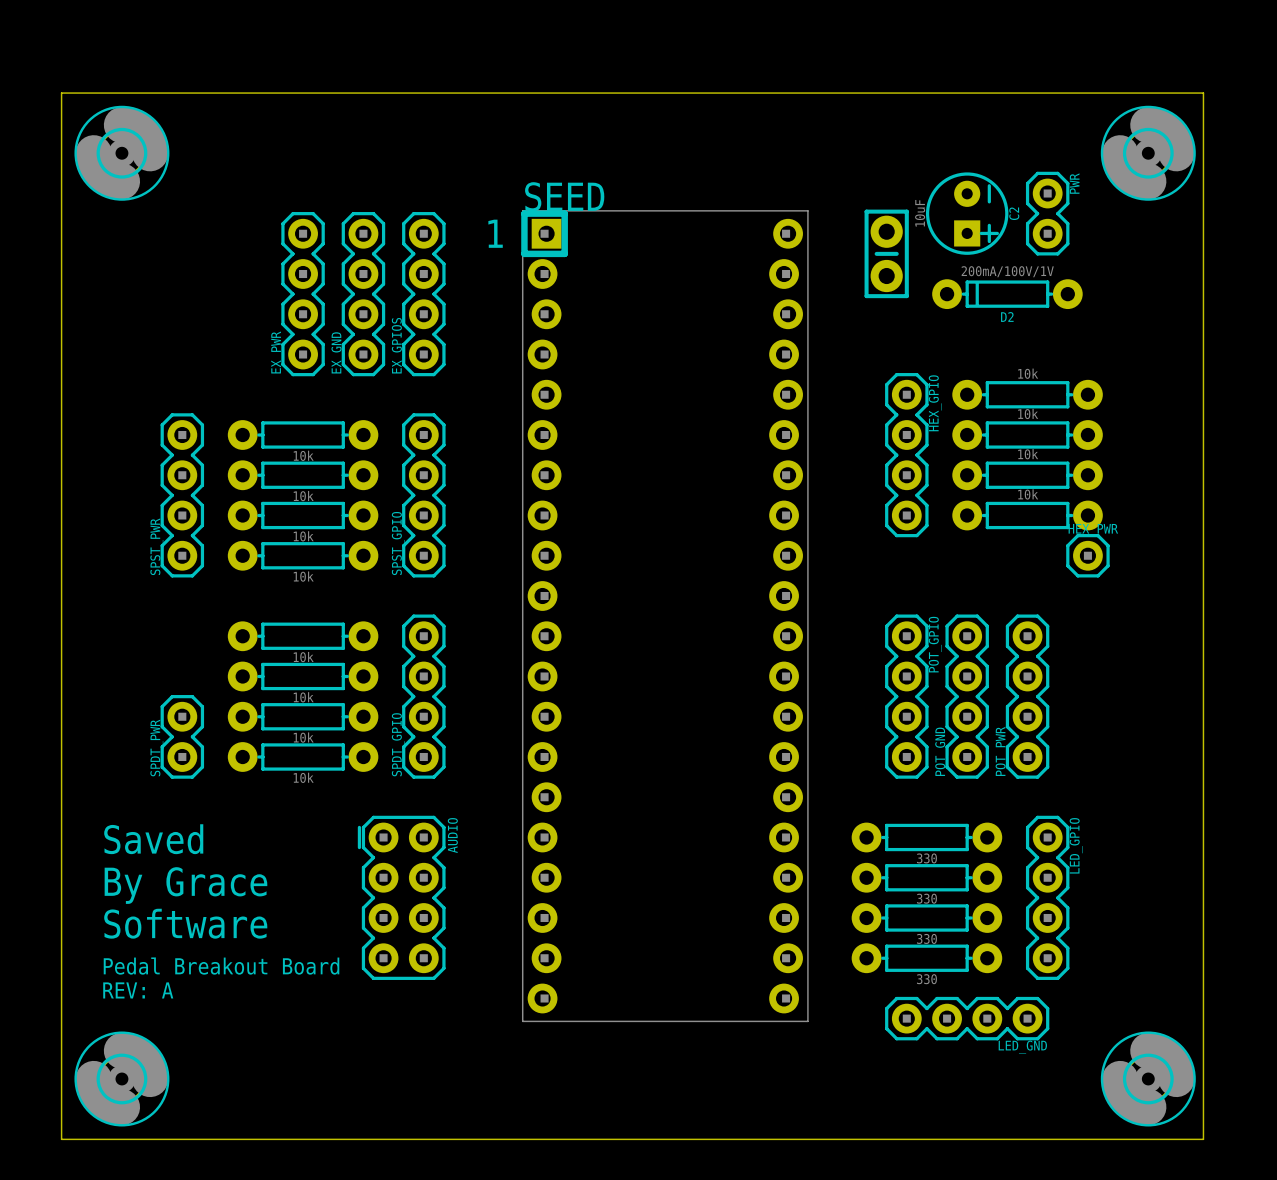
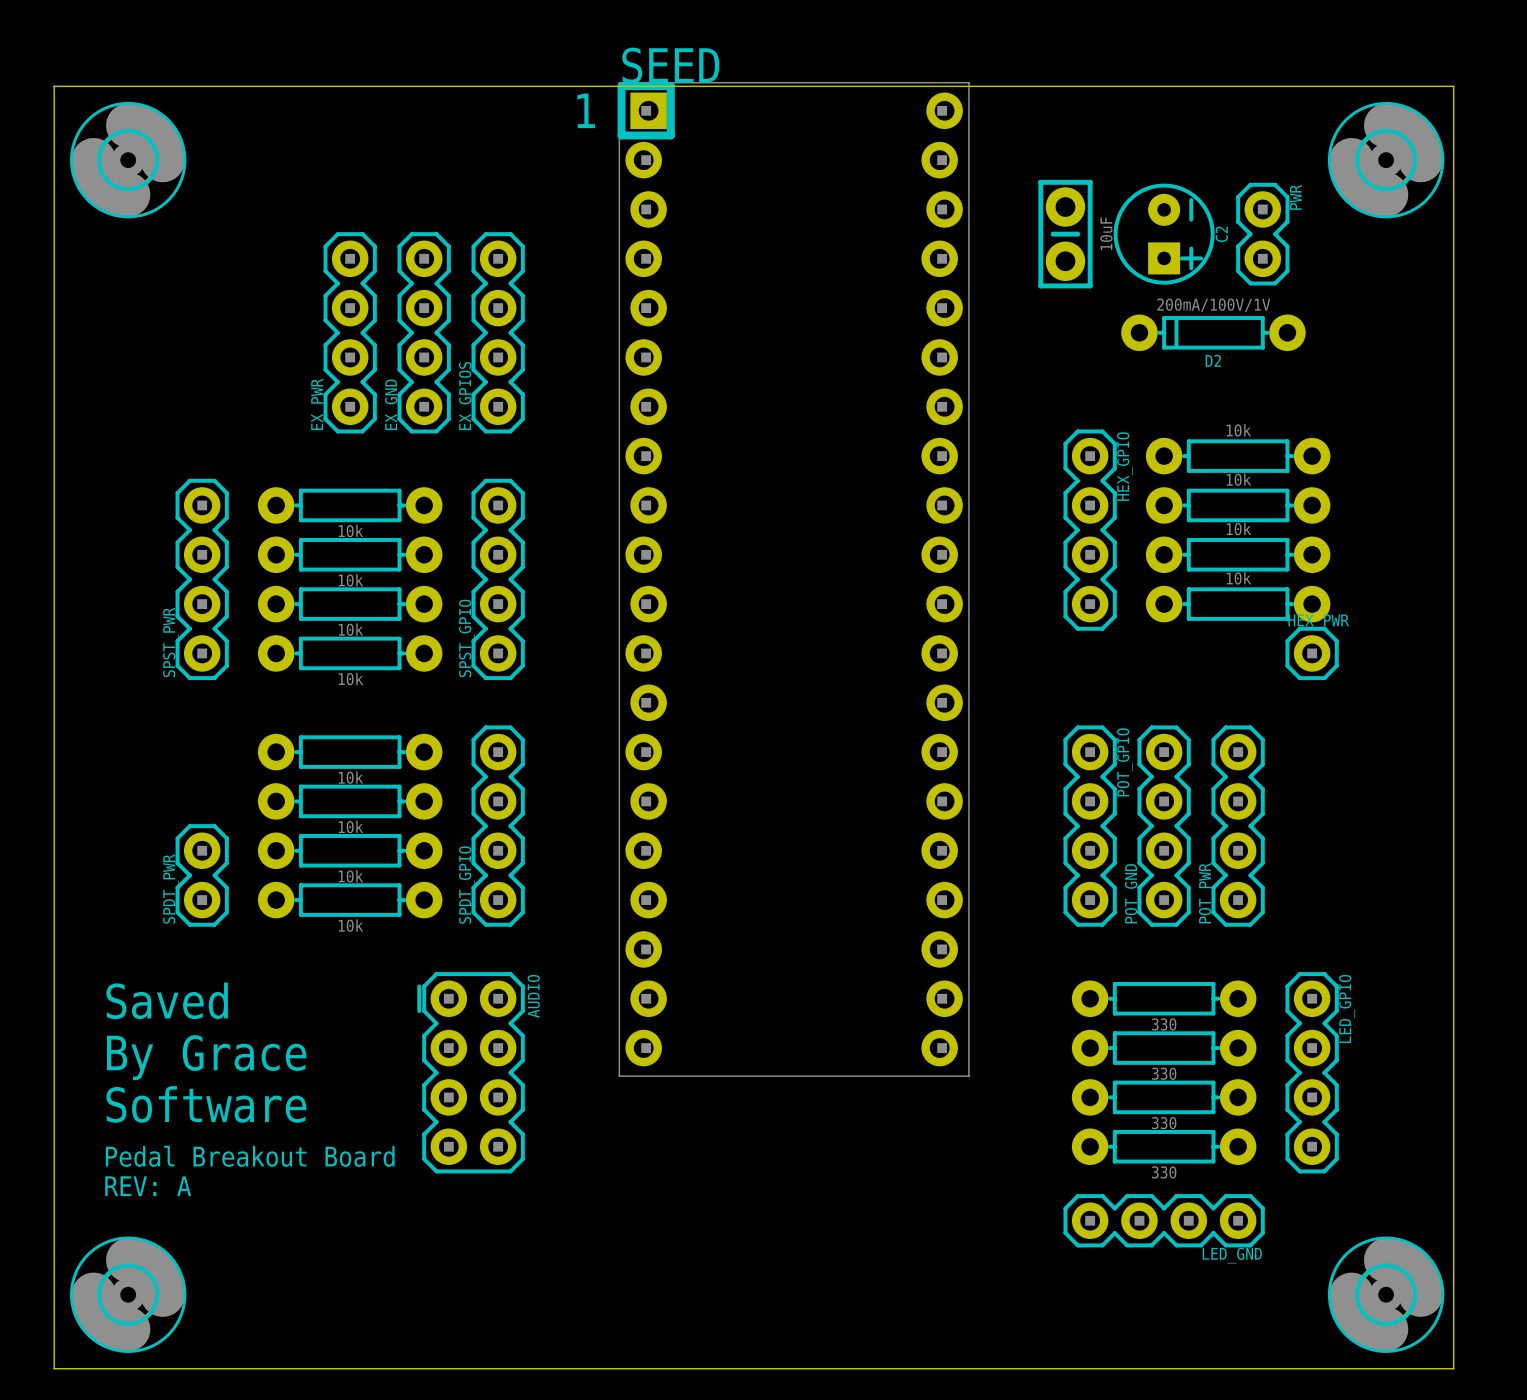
part position: (886, 253) -> (1065, 234)
SEED position: (664, 616) -> (793, 579)
part: 330 (926, 837) -> none
part: none -> 330 (1164, 998)
part: 330 (926, 877) -> none
part: none -> 330 (1164, 1048)
LED_GPIO position: (1047, 897) -> (1312, 1072)
part: 330 (926, 917) -> none
part: none -> 330 (1164, 1097)
part: 330 (926, 958) -> none
part: none -> 330 (1164, 1146)

